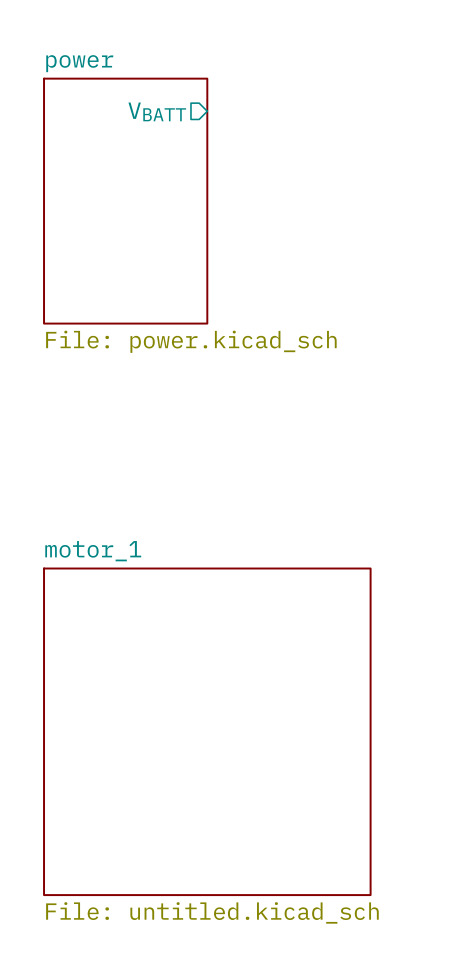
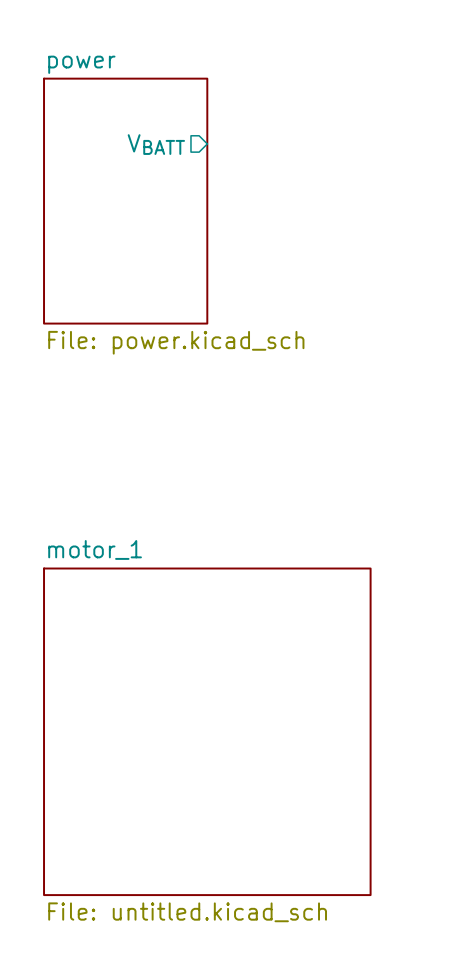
sheet pin position: VBATT (157, 111) -> VBATT (156, 144)

